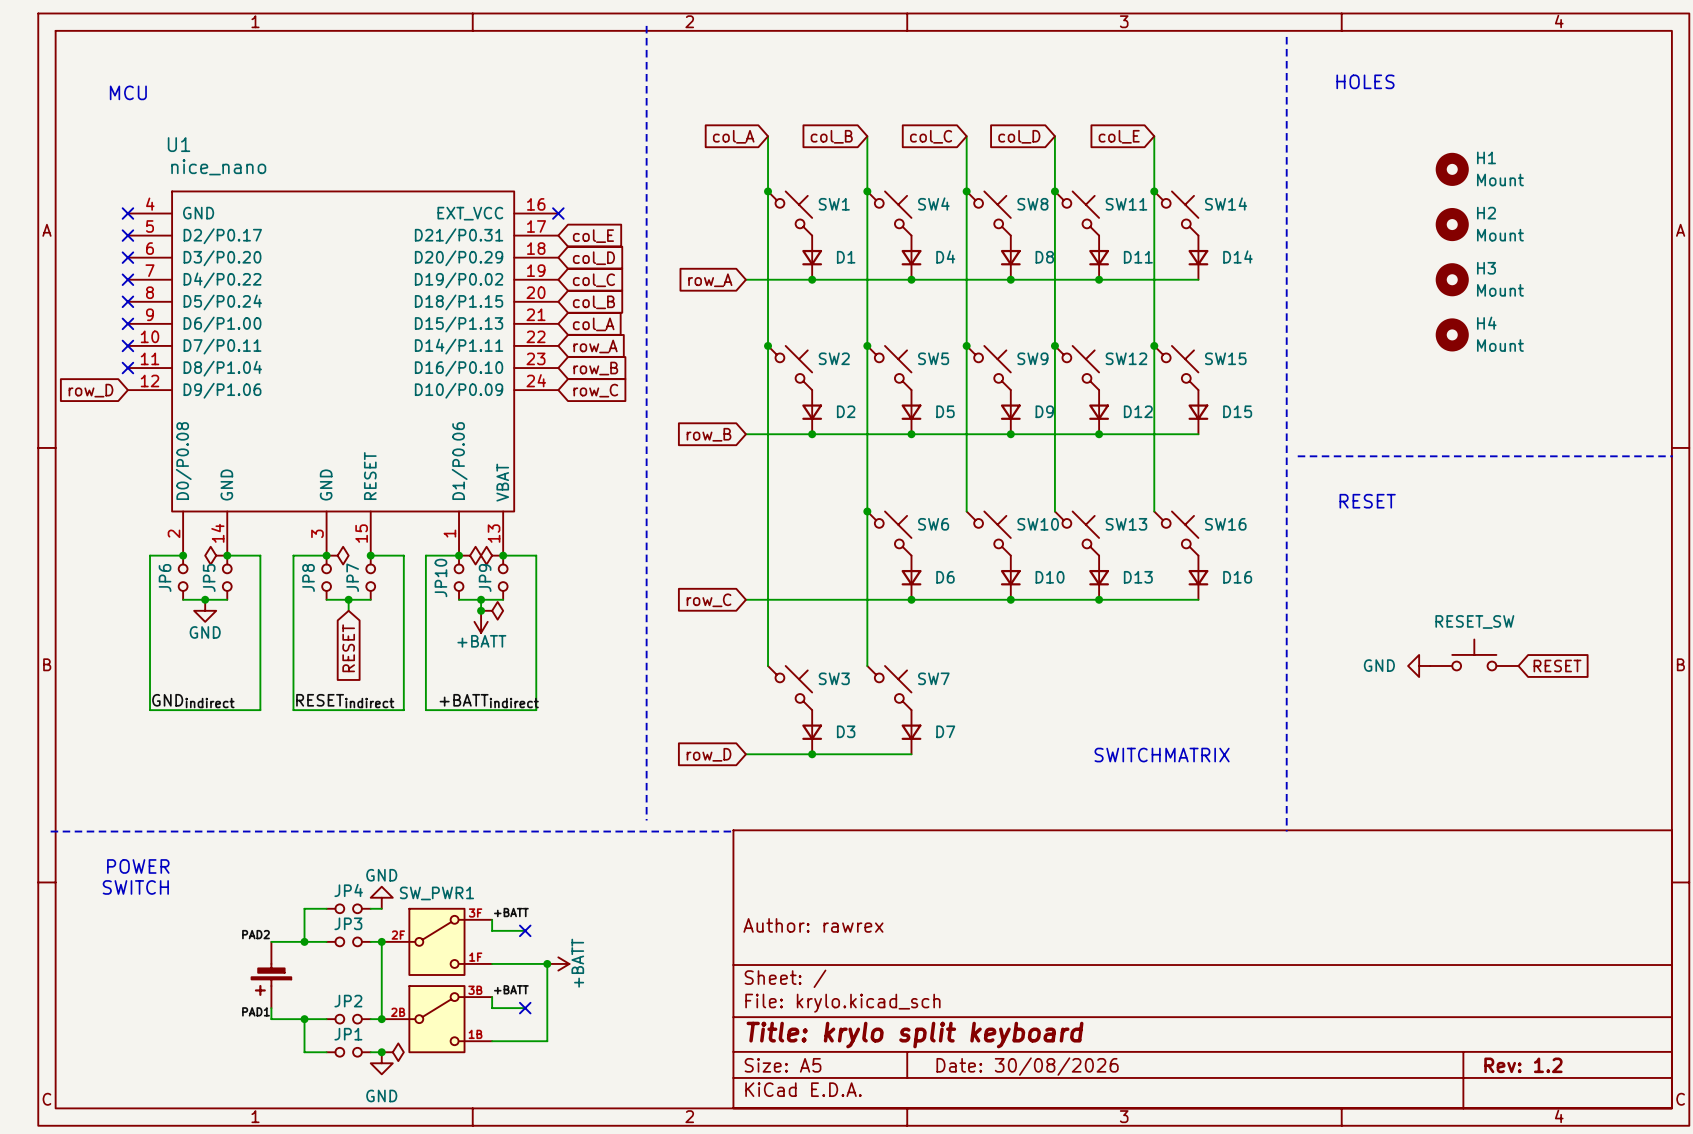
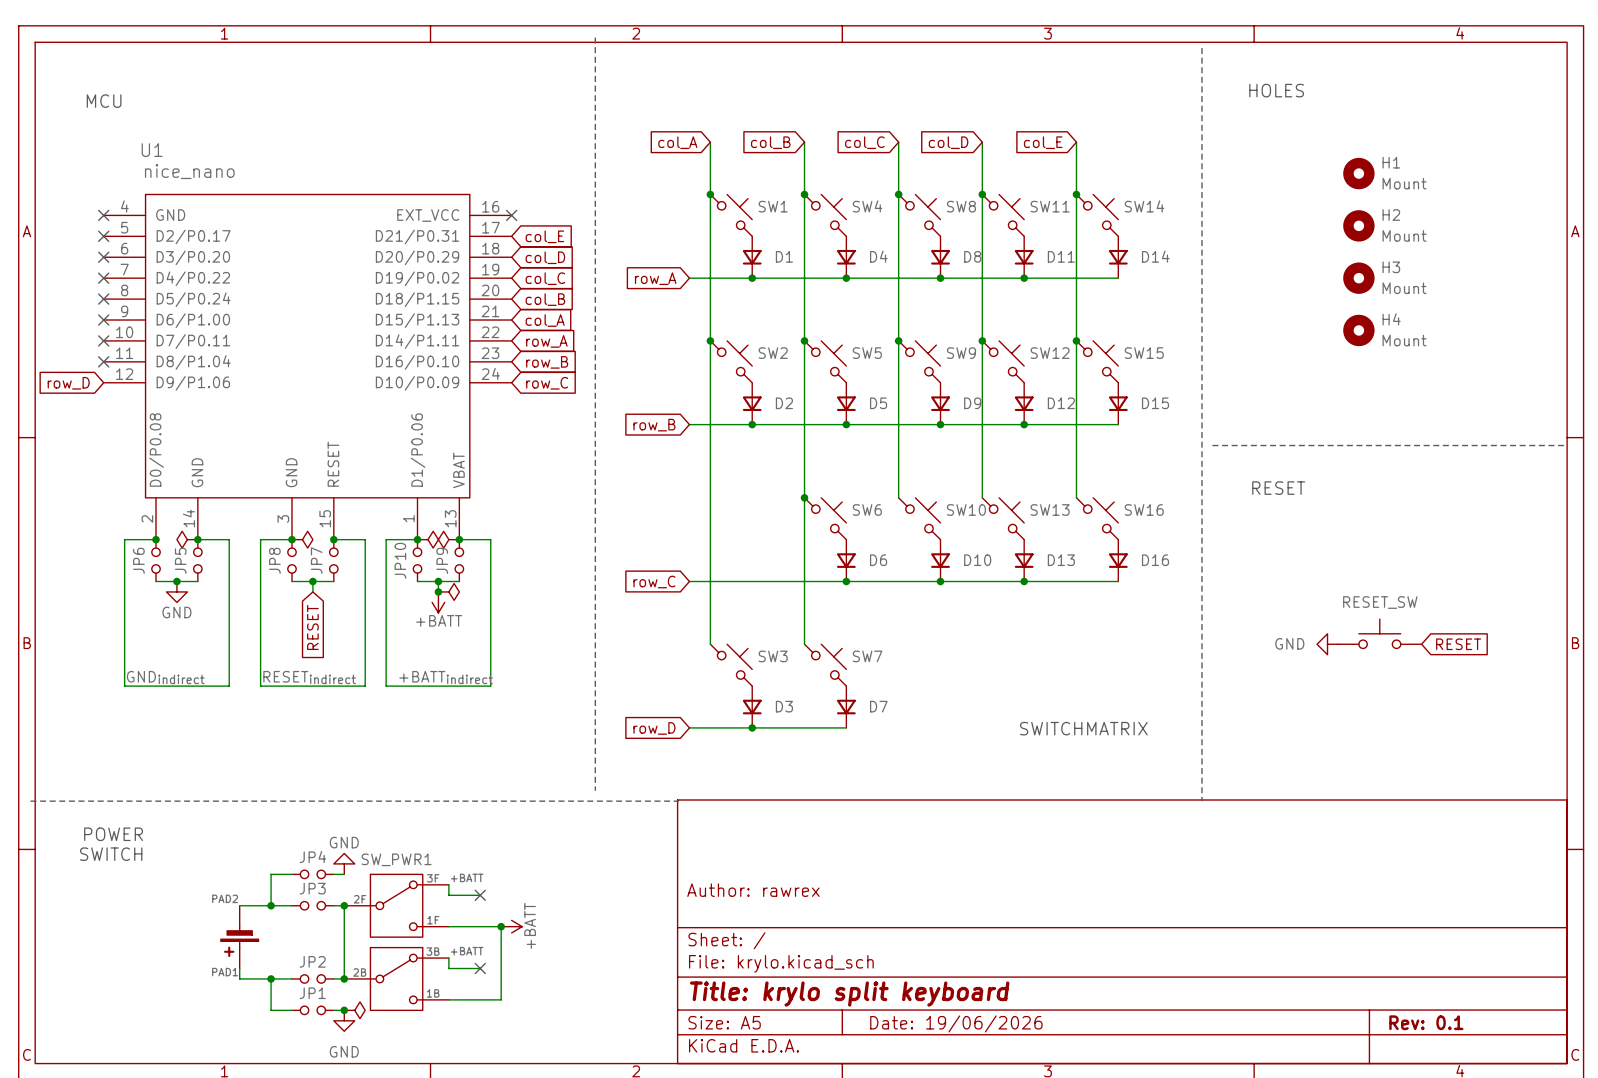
title block: Rev: 1.2 (1523, 1065) -> Rev: 0.1 (1426, 1022)
title block: Date: 30/08/2026 (1027, 1066) -> Date: 19/06/2026 (956, 1023)

